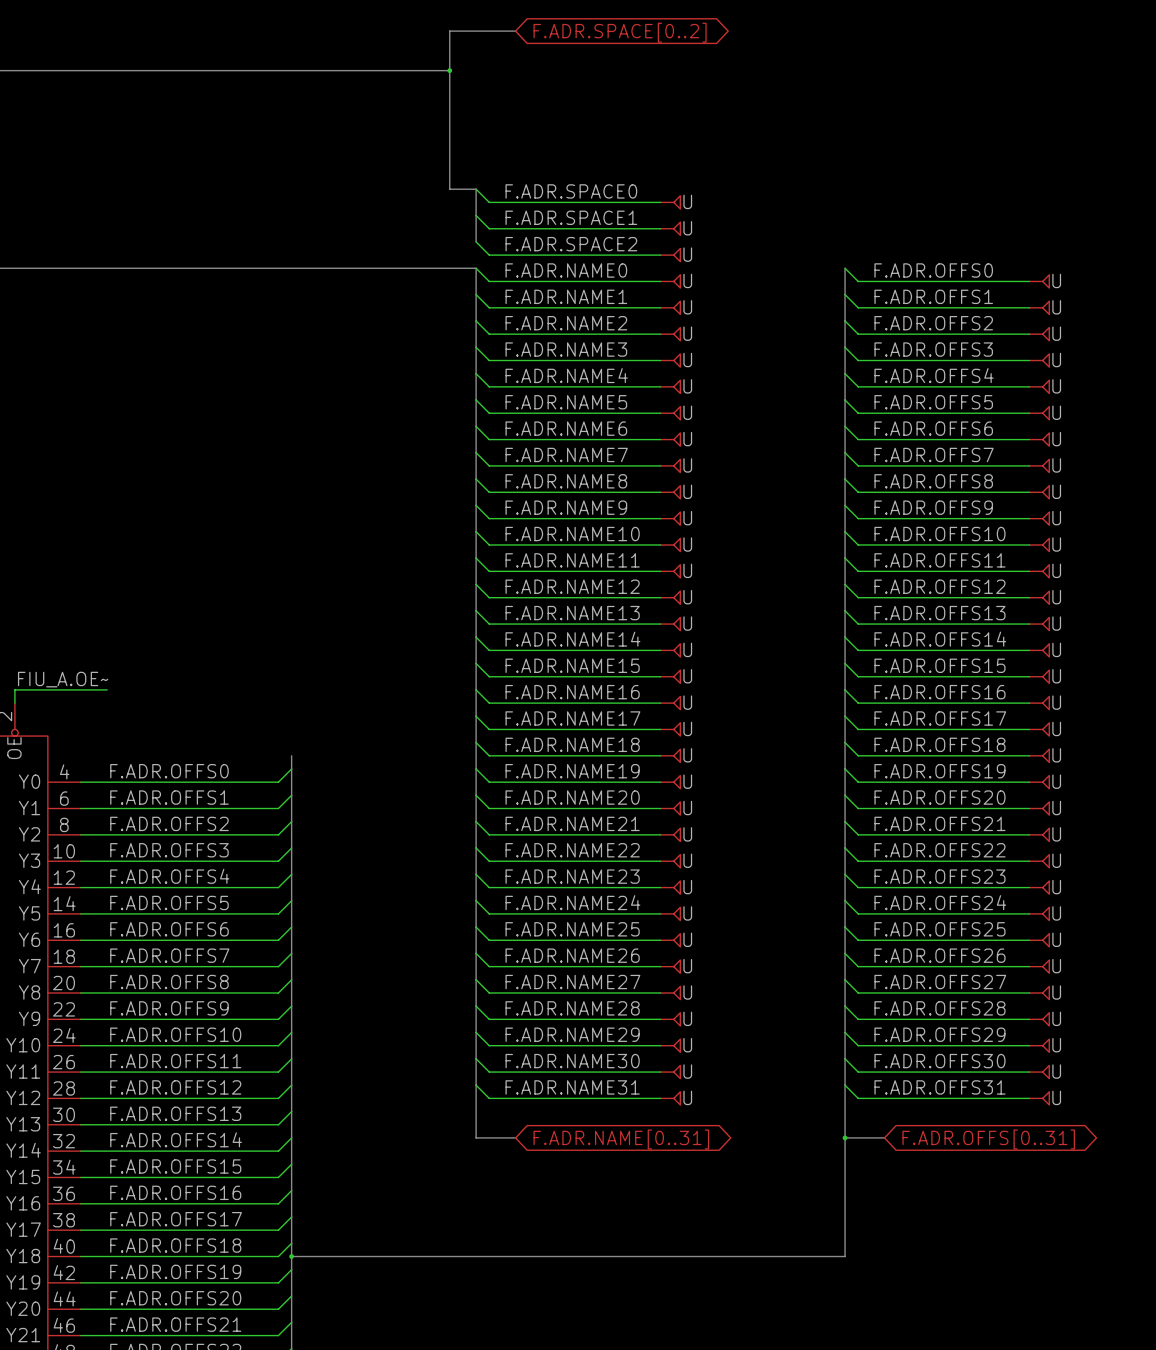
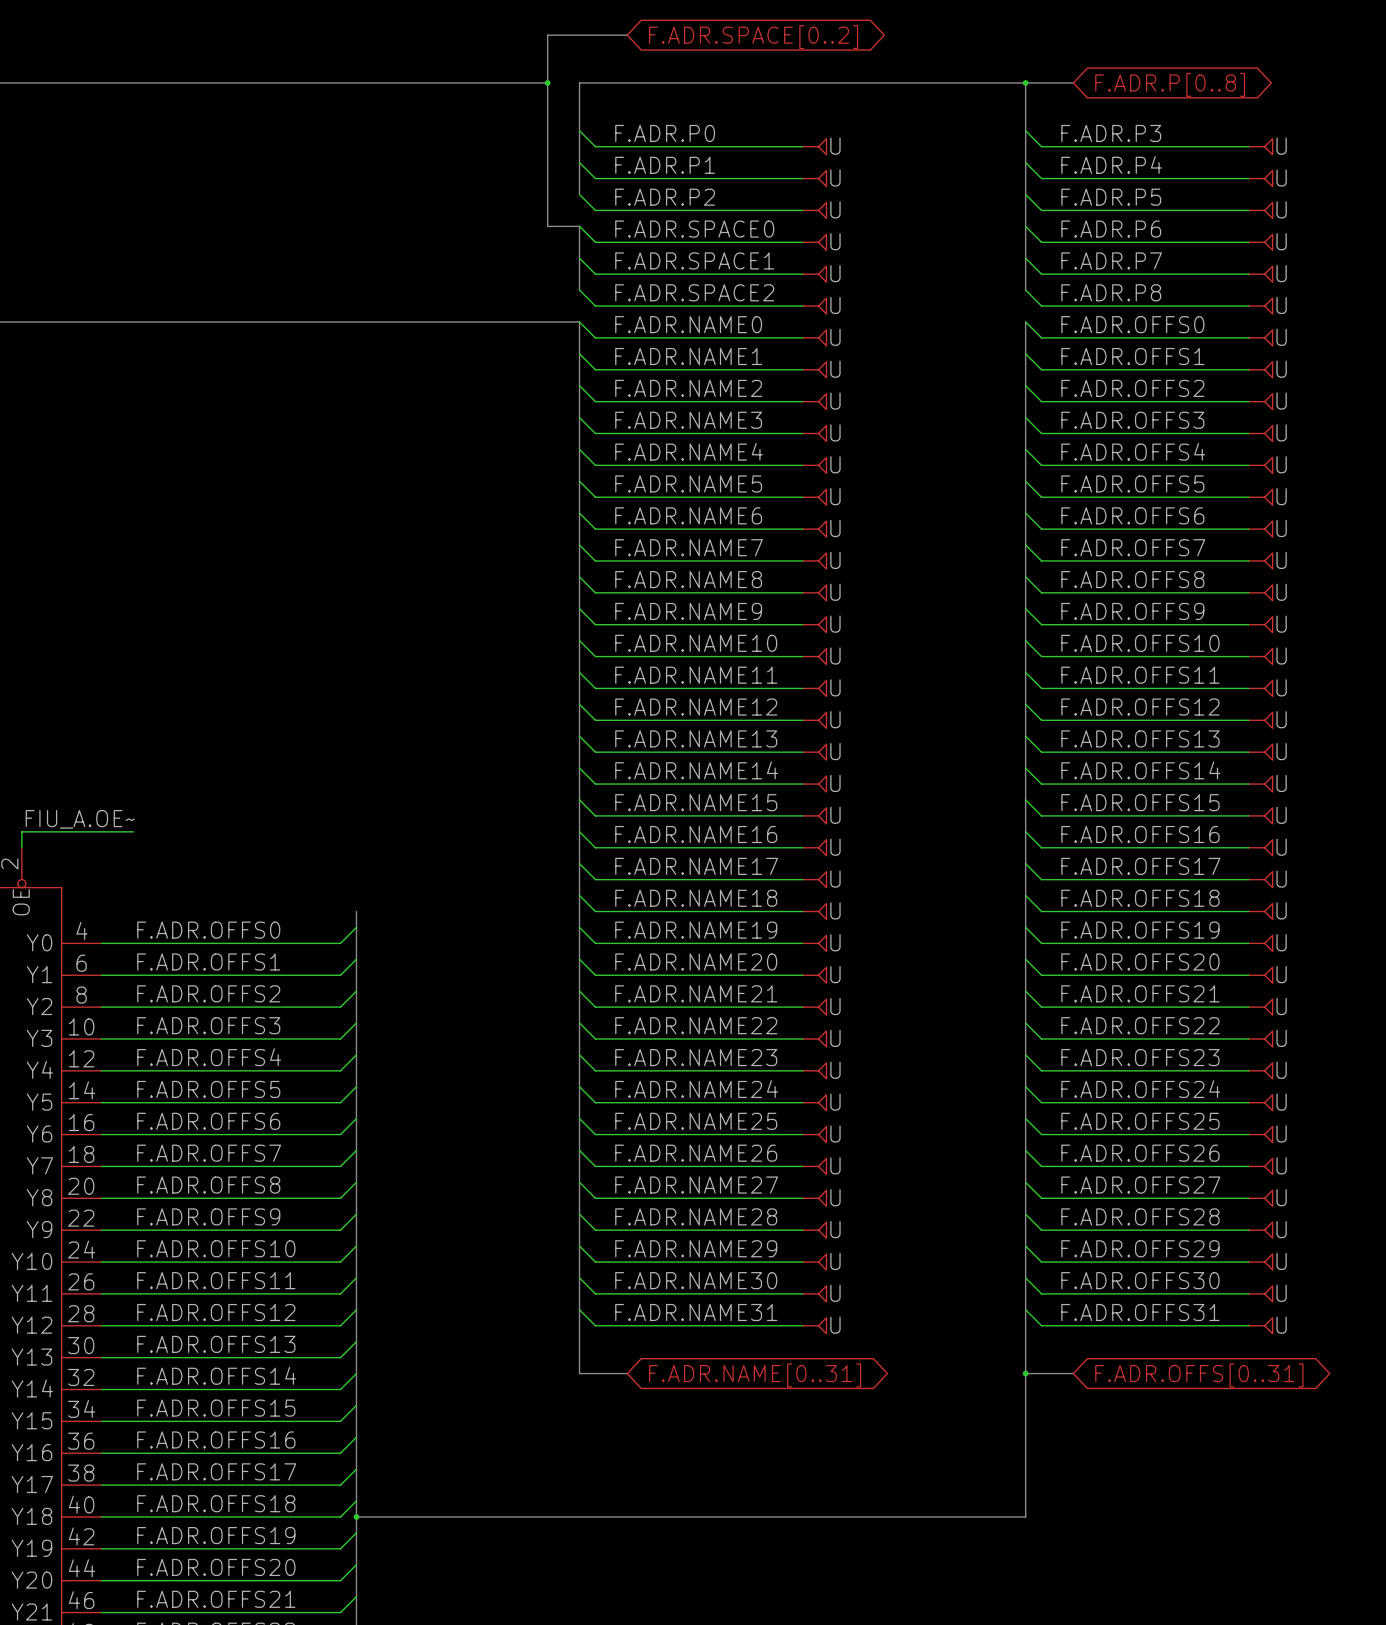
bus: none -> (1025, 82) (1025, 290)
junction: none -> (1025, 82)
bus: none -> (1073, 82) (579, 82) (579, 194)
global label: none -> F.ADR.P[0..8] (1170, 84)
wire: none -> (579, 130) (595, 146) (802, 146)
wire: none -> (1025, 130) (1041, 146) (1248, 146)
label: none -> F.ADR.P0 (665, 133)
label: none -> F.ADR.P3 (1111, 133)
U: none -> (814, 146)
U: none -> (1260, 146)
wire: none -> (579, 162) (595, 178) (802, 178)
wire: none -> (1025, 162) (1041, 178) (1248, 178)
label: none -> F.ADR.P1 (665, 165)
label: none -> F.ADR.P4 (1111, 164)
U: none -> (814, 178)
U: none -> (1260, 178)
wire: none -> (579, 194) (595, 210) (802, 210)
wire: none -> (1025, 194) (1041, 210) (1248, 210)
label: none -> F.ADR.P2 (665, 197)
label: none -> F.ADR.P5 (1111, 197)
U: none -> (814, 210)
U: none -> (1260, 210)
wire: none -> (1025, 226) (1041, 242) (1248, 242)
label: none -> F.ADR.P6 (1111, 229)
U: none -> (1260, 242)
wire: none -> (1025, 258) (1041, 274) (1248, 274)
label: none -> F.ADR.P7 (1111, 260)
U: none -> (1260, 274)
wire: none -> (1025, 290) (1041, 306) (1248, 306)
label: none -> F.ADR.P8 (1111, 292)
U: none -> (1260, 306)

